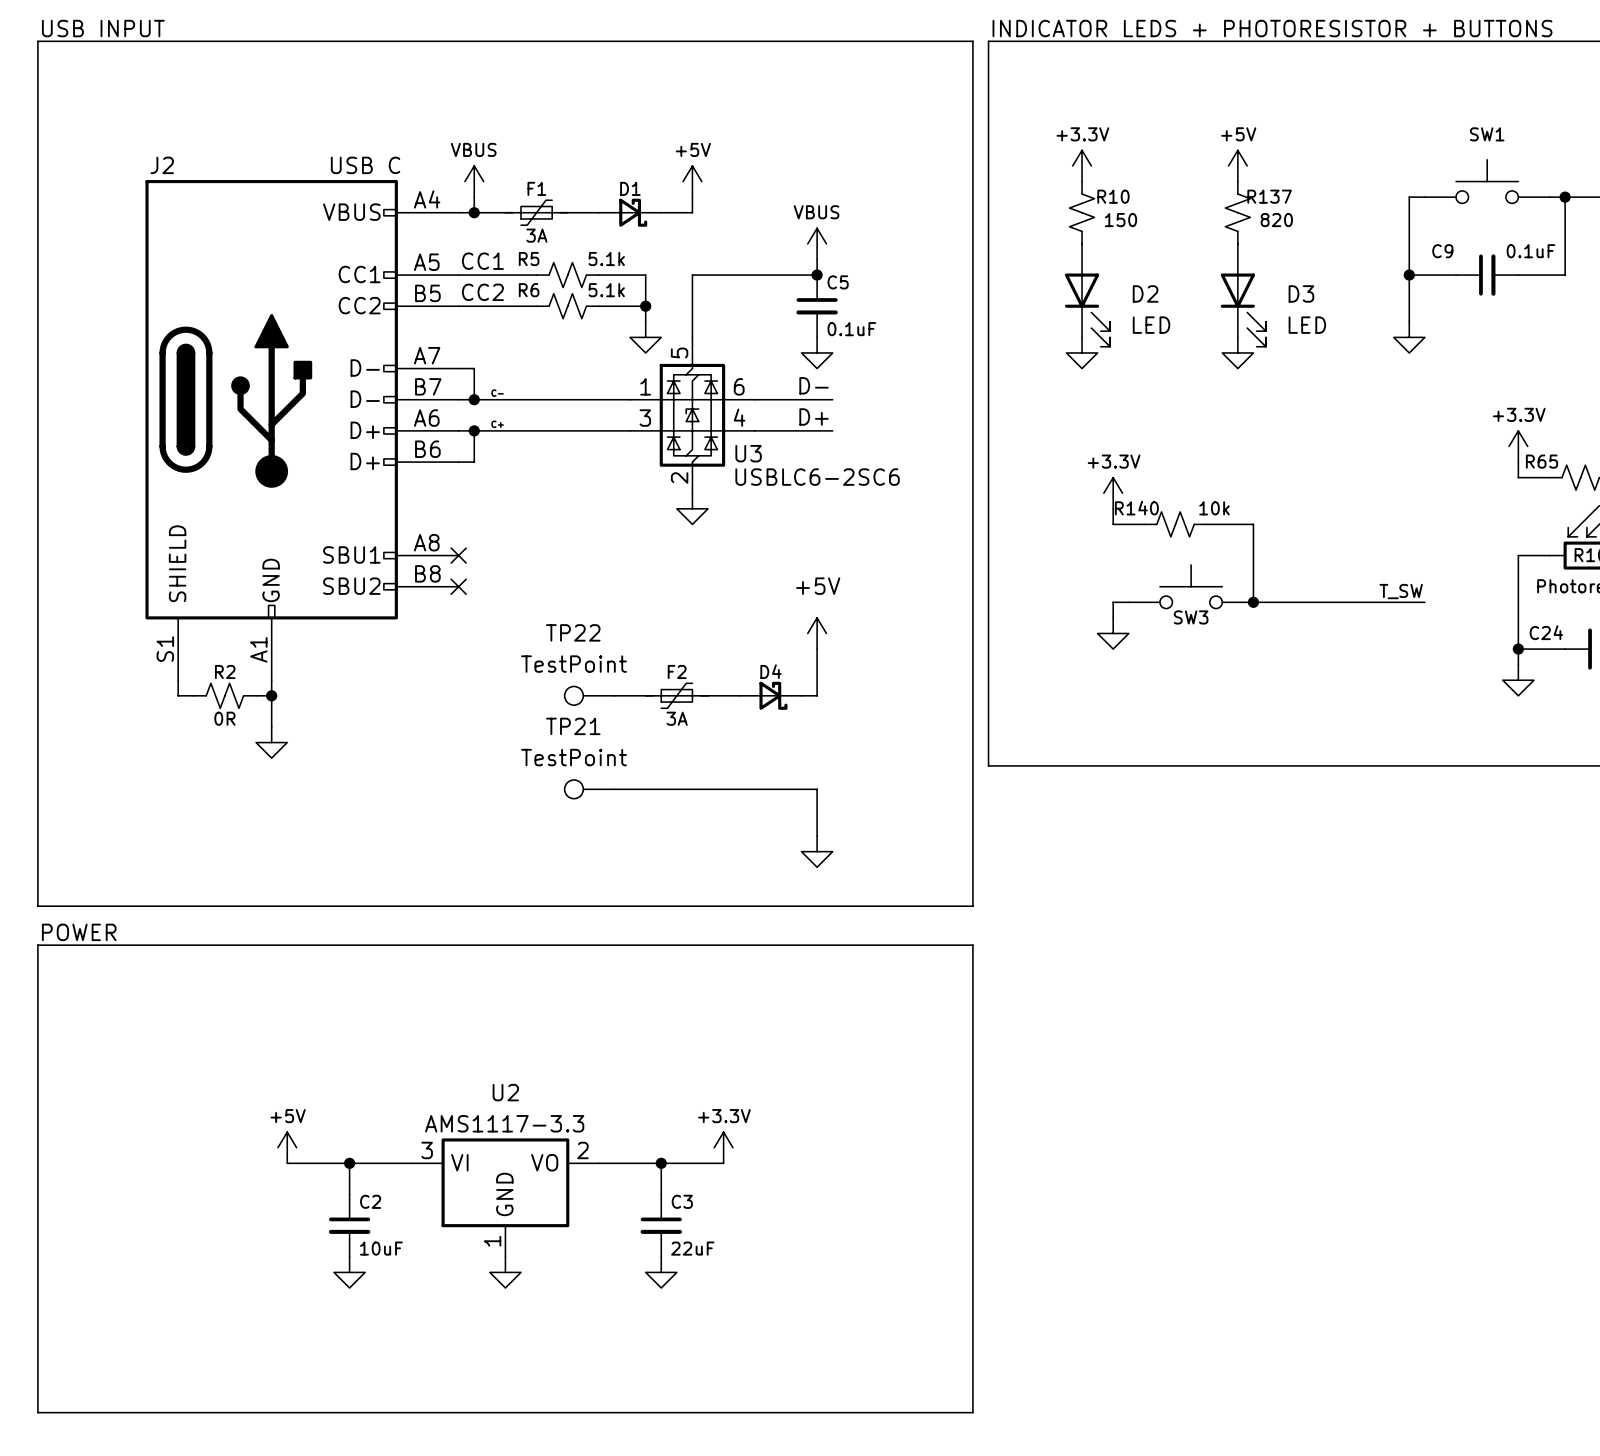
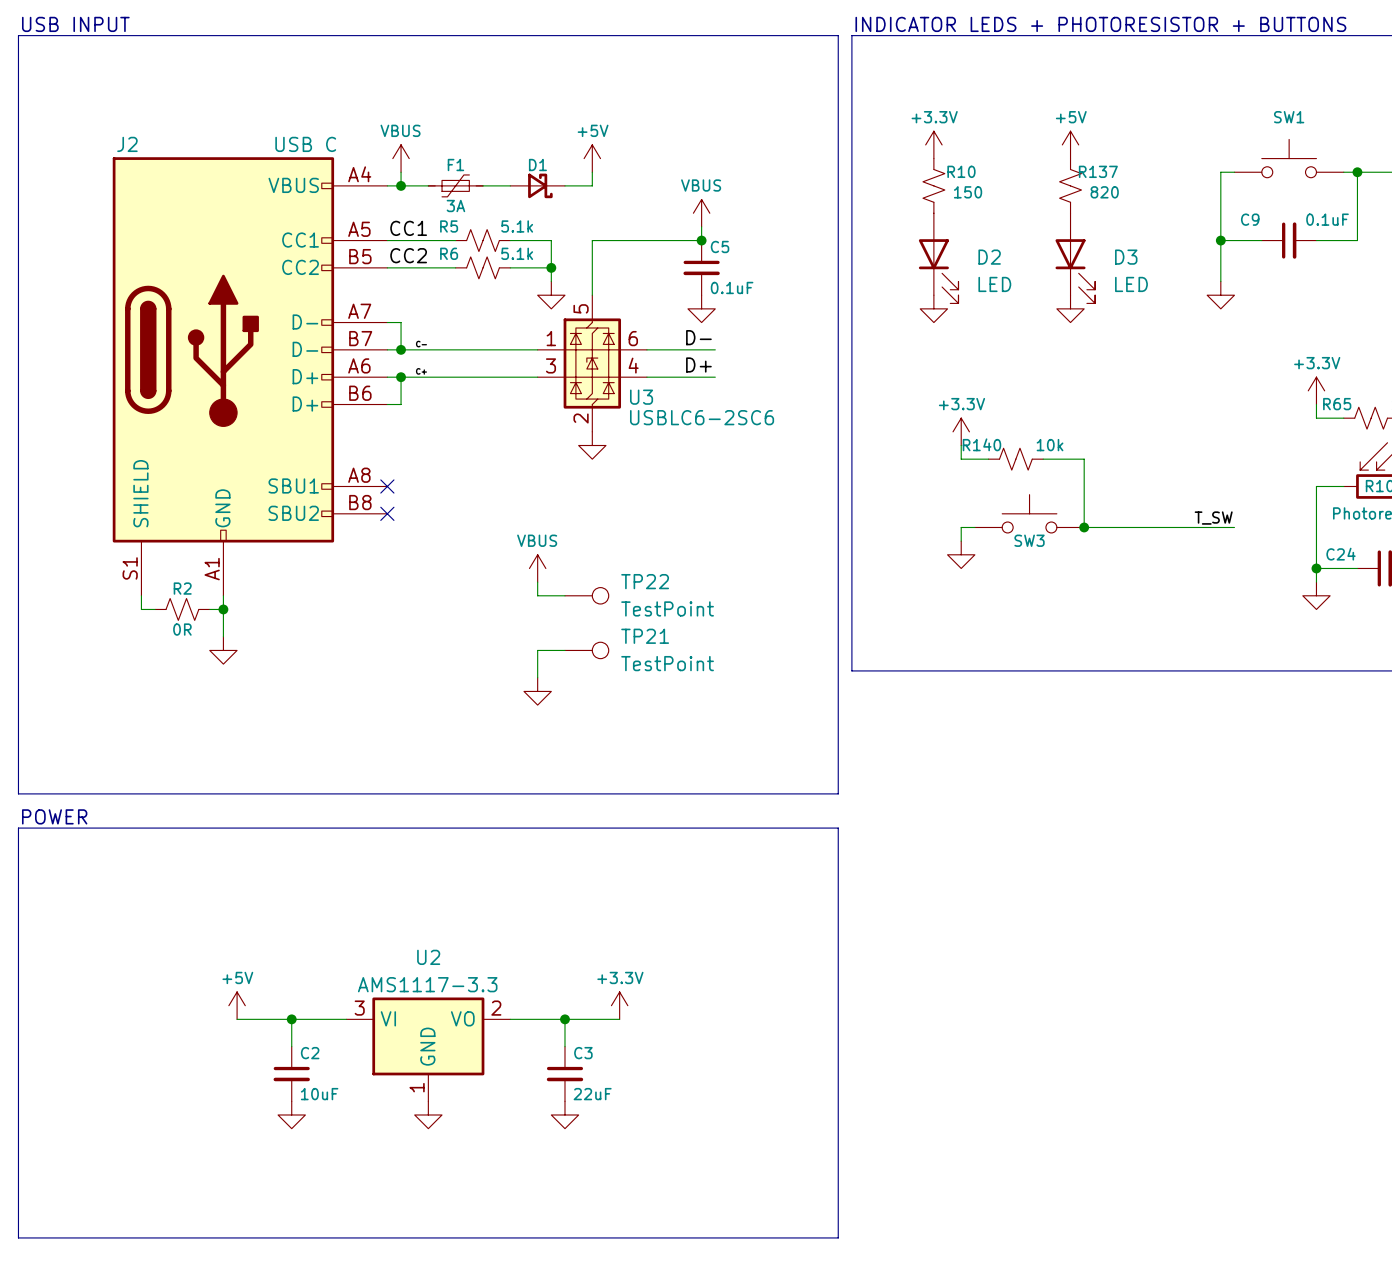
TP22 name position: TP22 (573, 632) -> TP22 (645, 581)
power symbol: +5V (817, 633) -> none
power symbol: none -> VBUS (537, 568)
wire: (817, 649) (817, 695) (801, 695) -> none
TP22 value position: TestPoint (574, 664) -> TestPoint (667, 608)
wire: none -> (537, 582) (537, 595) (564, 595)
TP22 rotation: 0° (574, 695) -> 180° (600, 595)
TP22 position: (589, 695) -> (586, 595)
wire: (614, 695) (645, 695) -> none
F2: 3A (676, 695) -> none
wire: (708, 695) (739, 695) -> none
D4: (770, 695) -> none
TP21 name position: TP21 (573, 726) -> TP21 (645, 636)
wire: none -> (564, 650) (537, 650) (537, 677)
TP21 value position: TestPoint (574, 757) -> TestPoint (667, 663)
TP21 rotation: 0° (574, 789) -> 180° (600, 650)
TP21 position: (589, 789) -> (586, 650)
wire: (614, 789) (817, 789) (817, 836) -> none
power symbol position: (817, 851) -> (537, 691)

